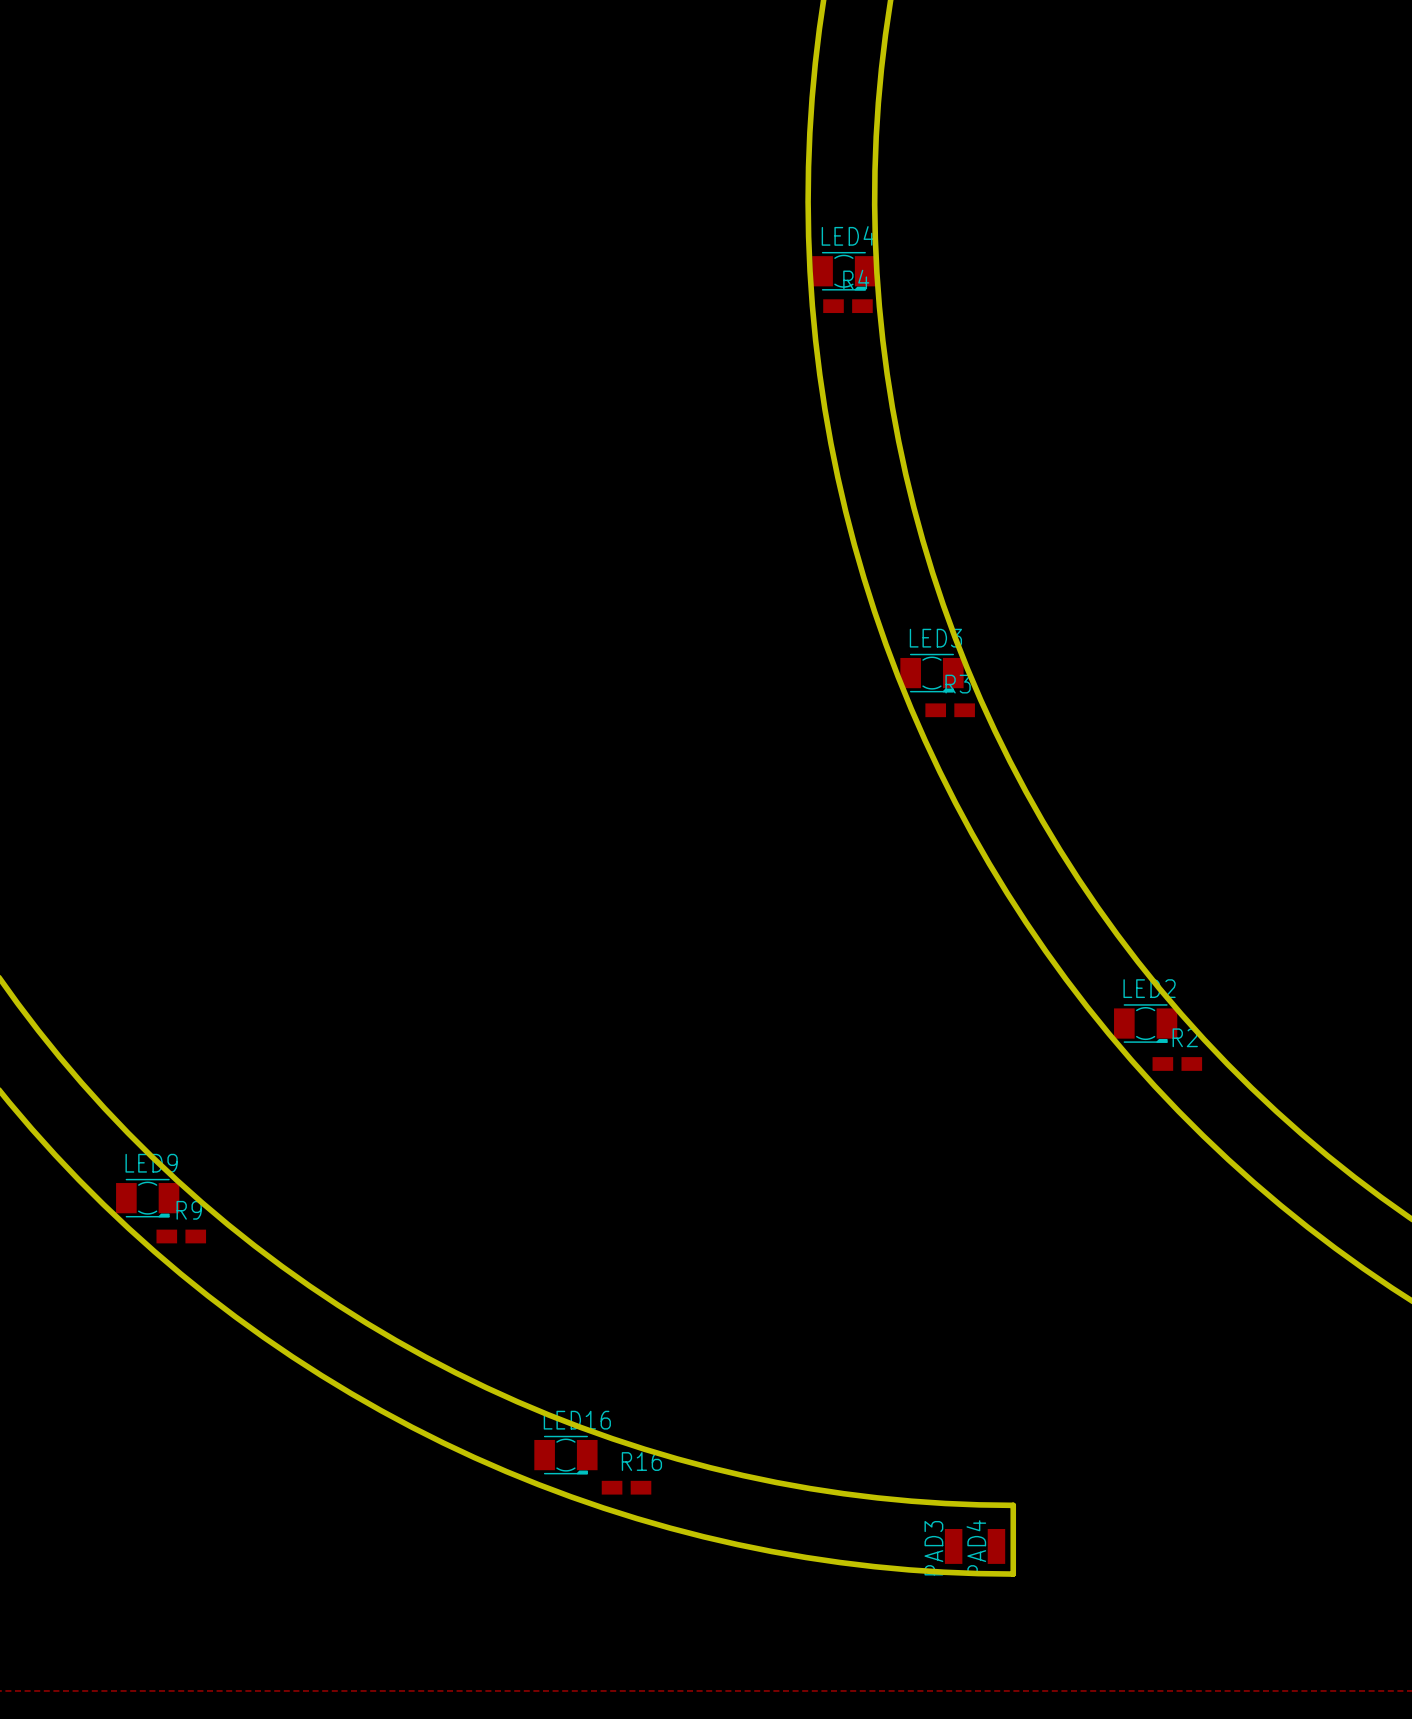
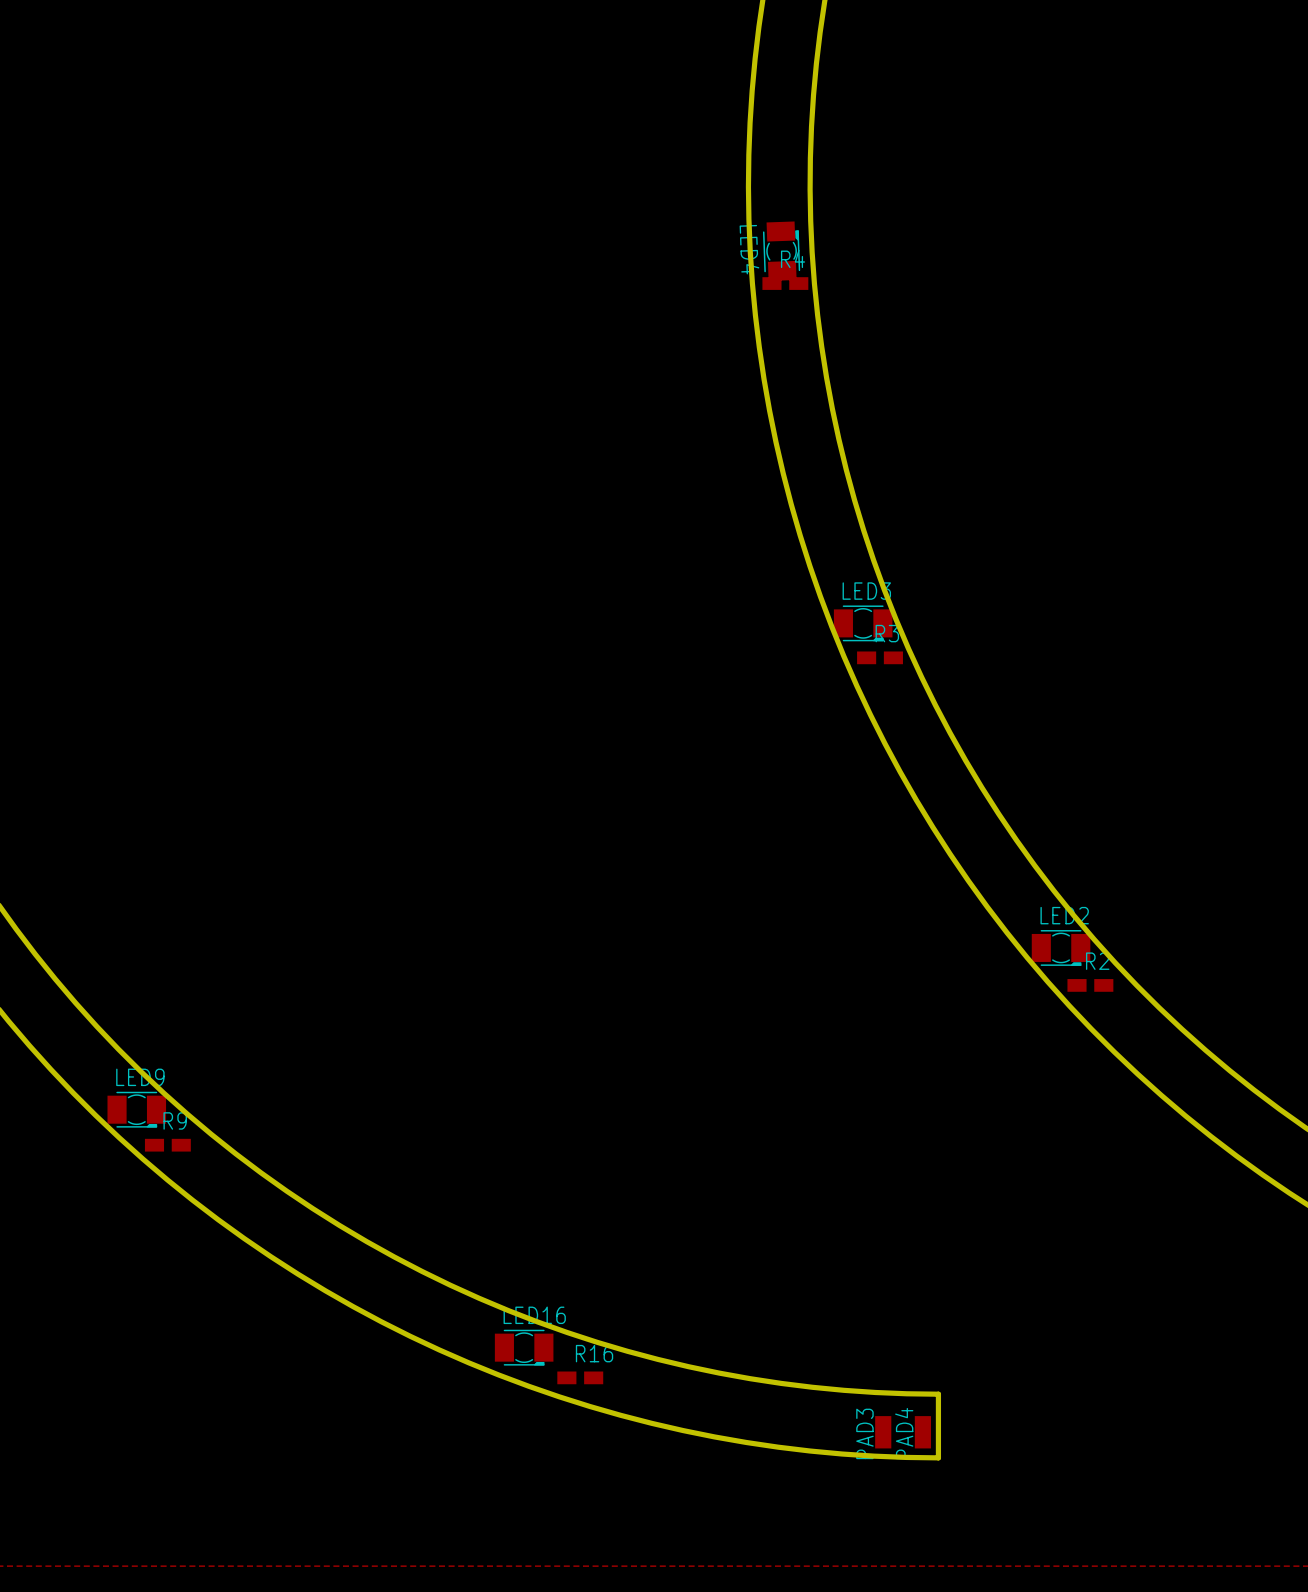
LED4 rotation: 0° (843, 271) -> 92° counterclockwise (781, 251)

